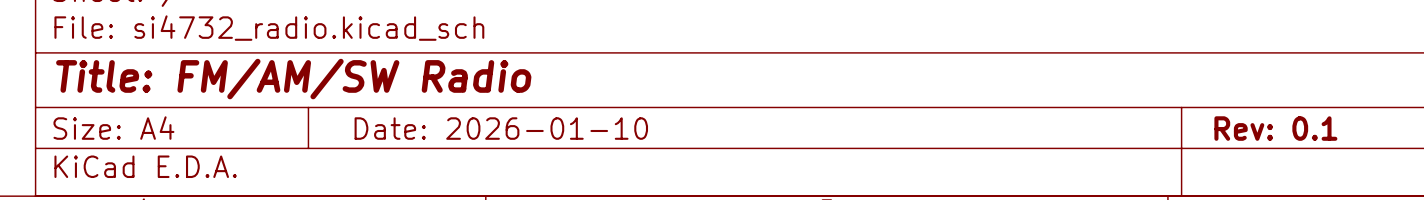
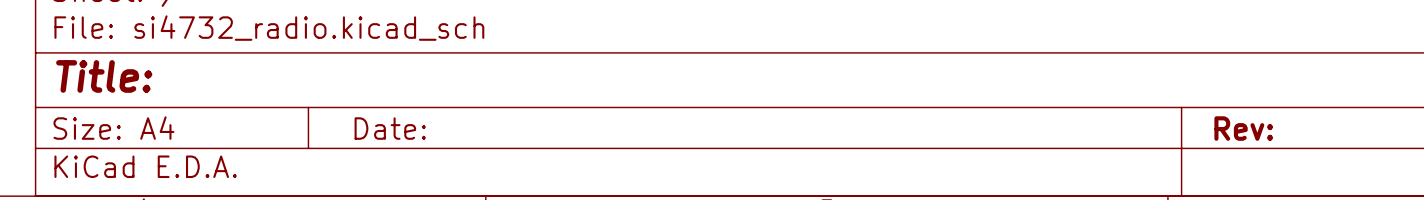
title block: Title: FM/AM/SW Radio (293, 79) -> Title: (104, 76)
title block: Date: 2026-01-10 (501, 128) -> Date: (390, 128)
title block: Rev: 0.1 (1275, 128) -> Rev: (1243, 128)

